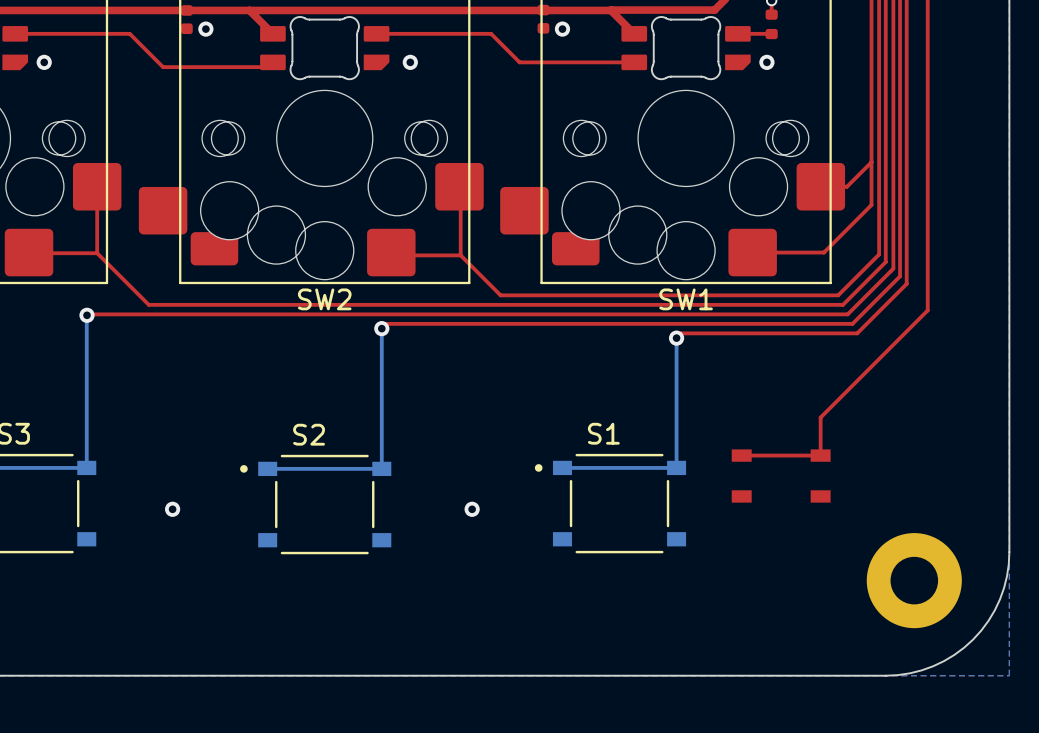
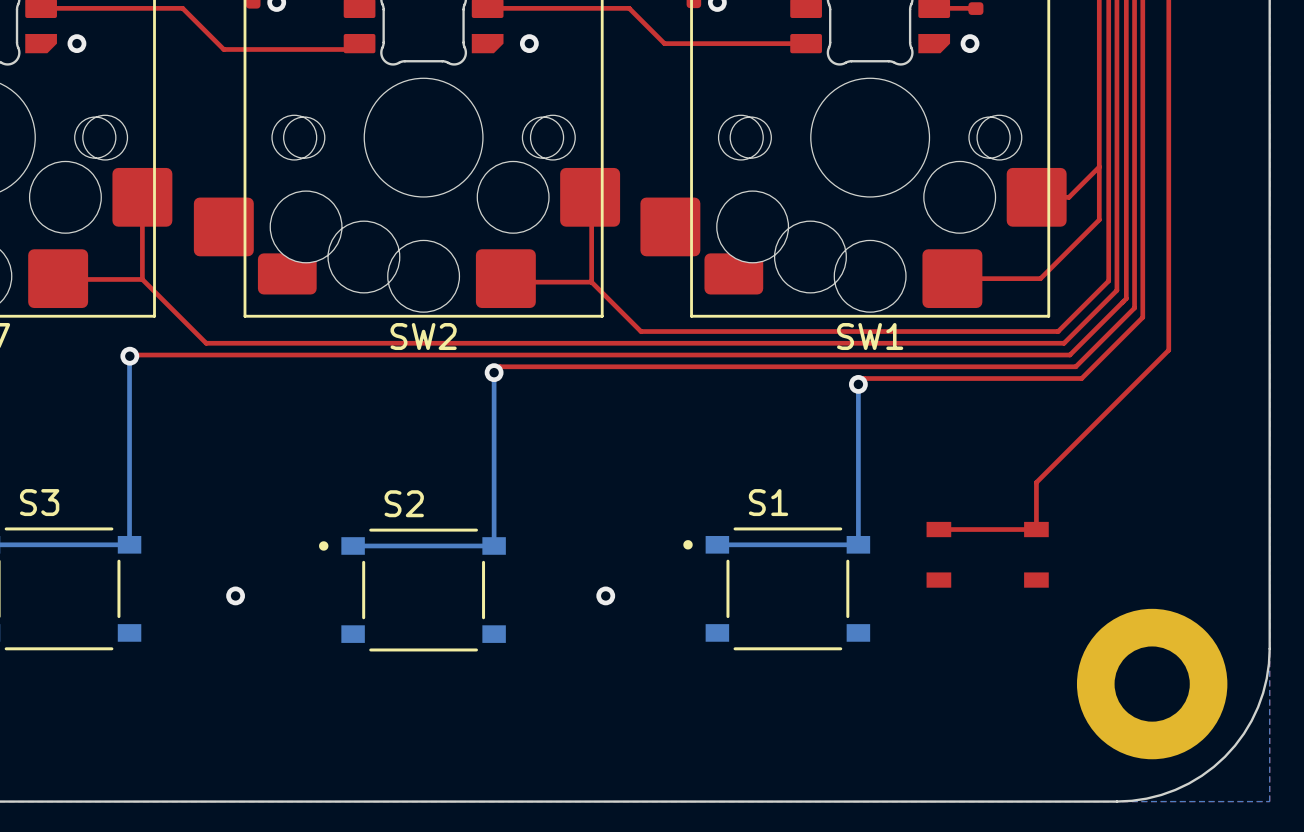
part footprint: [866, 533, 962, 629] -> [1076, 608, 1228, 760]

